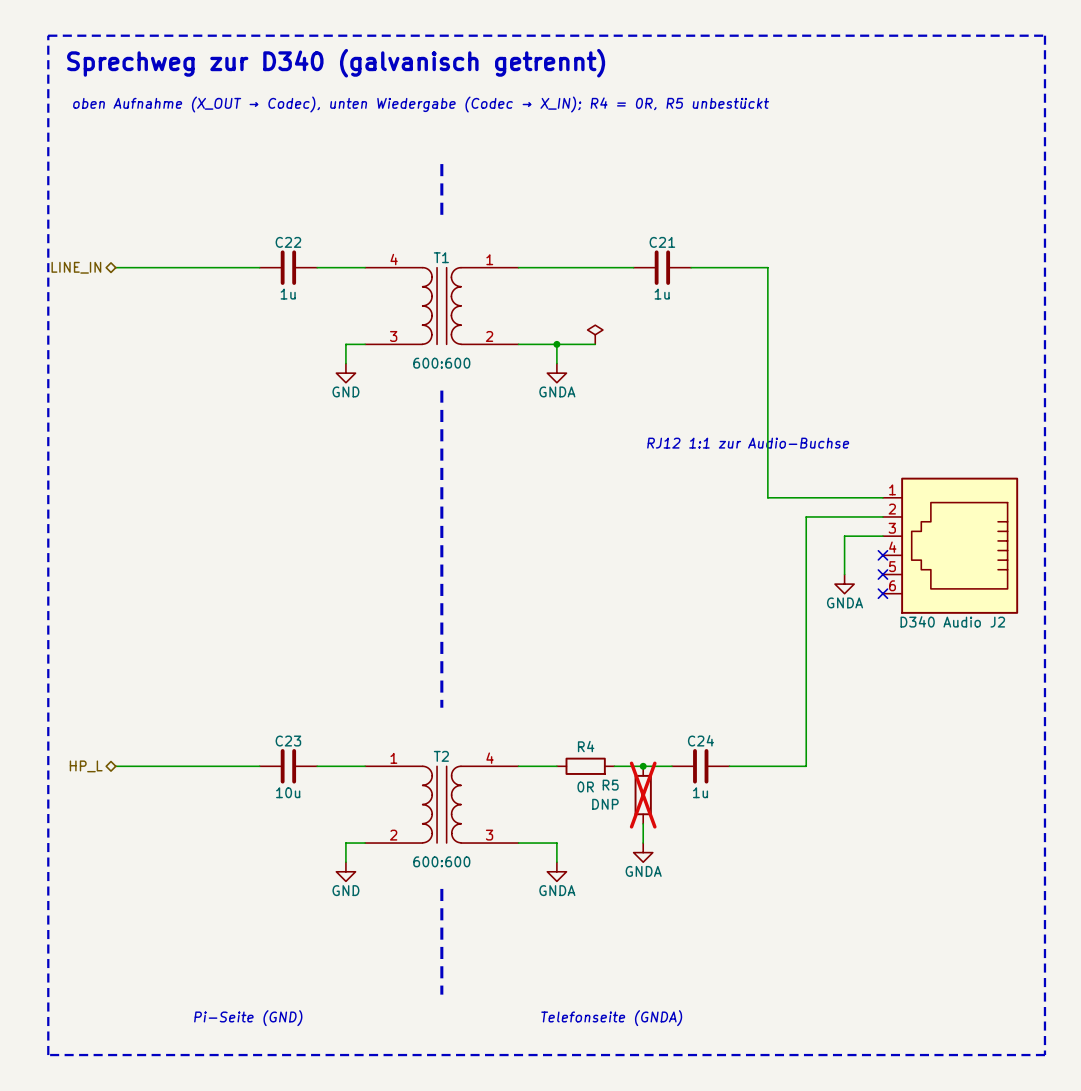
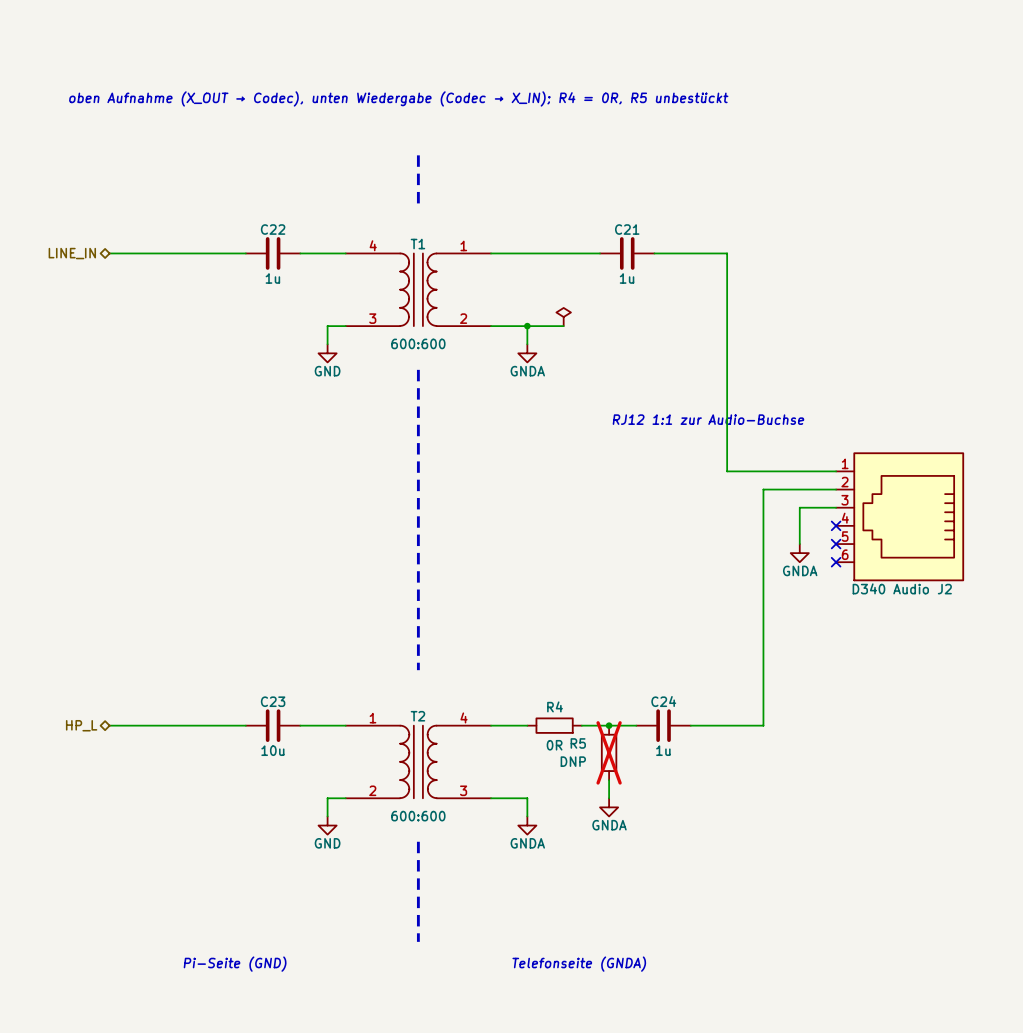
line: (48, 35) (1044, 35) (1044, 1055) (48, 1055) (48, 35) -> none
text: Sprechweg zur D340 (galvanisch getrennt) (336, 63) -> none

